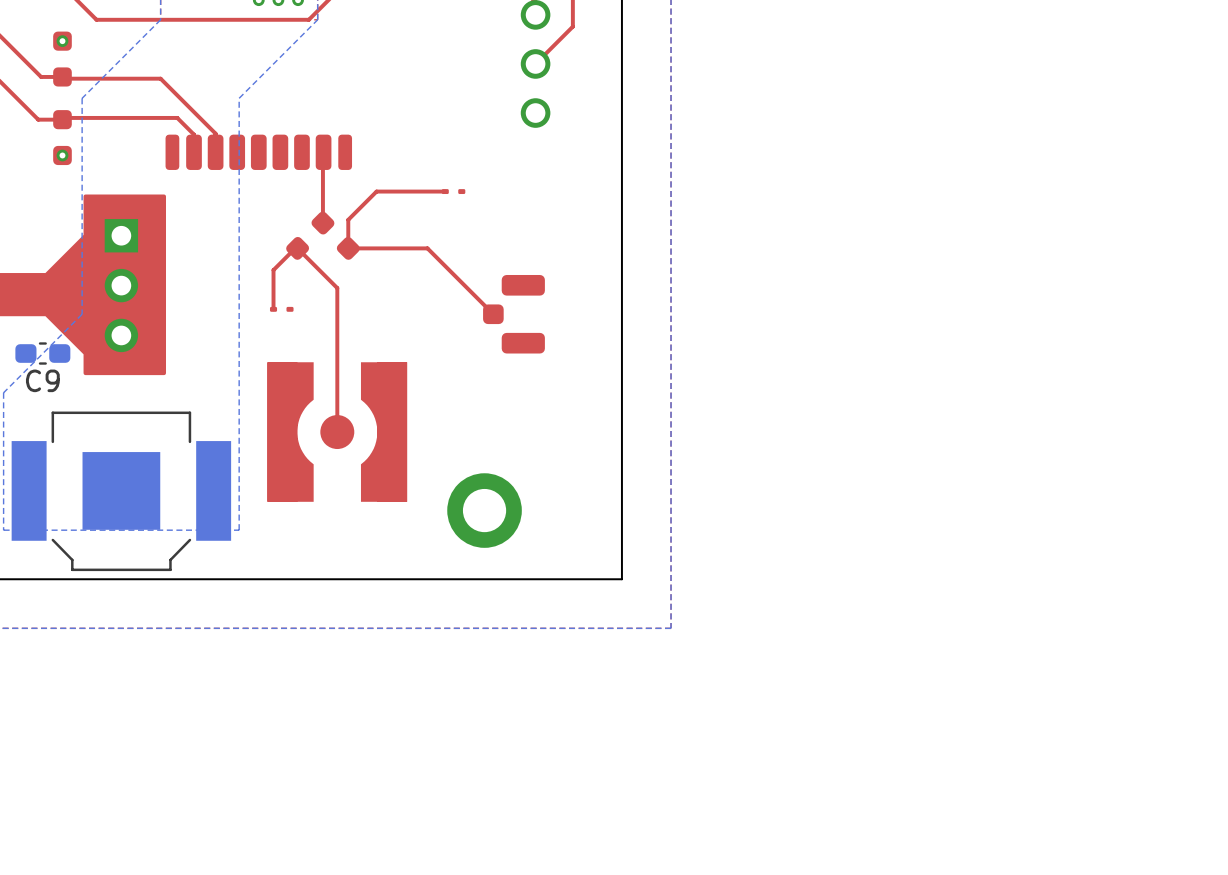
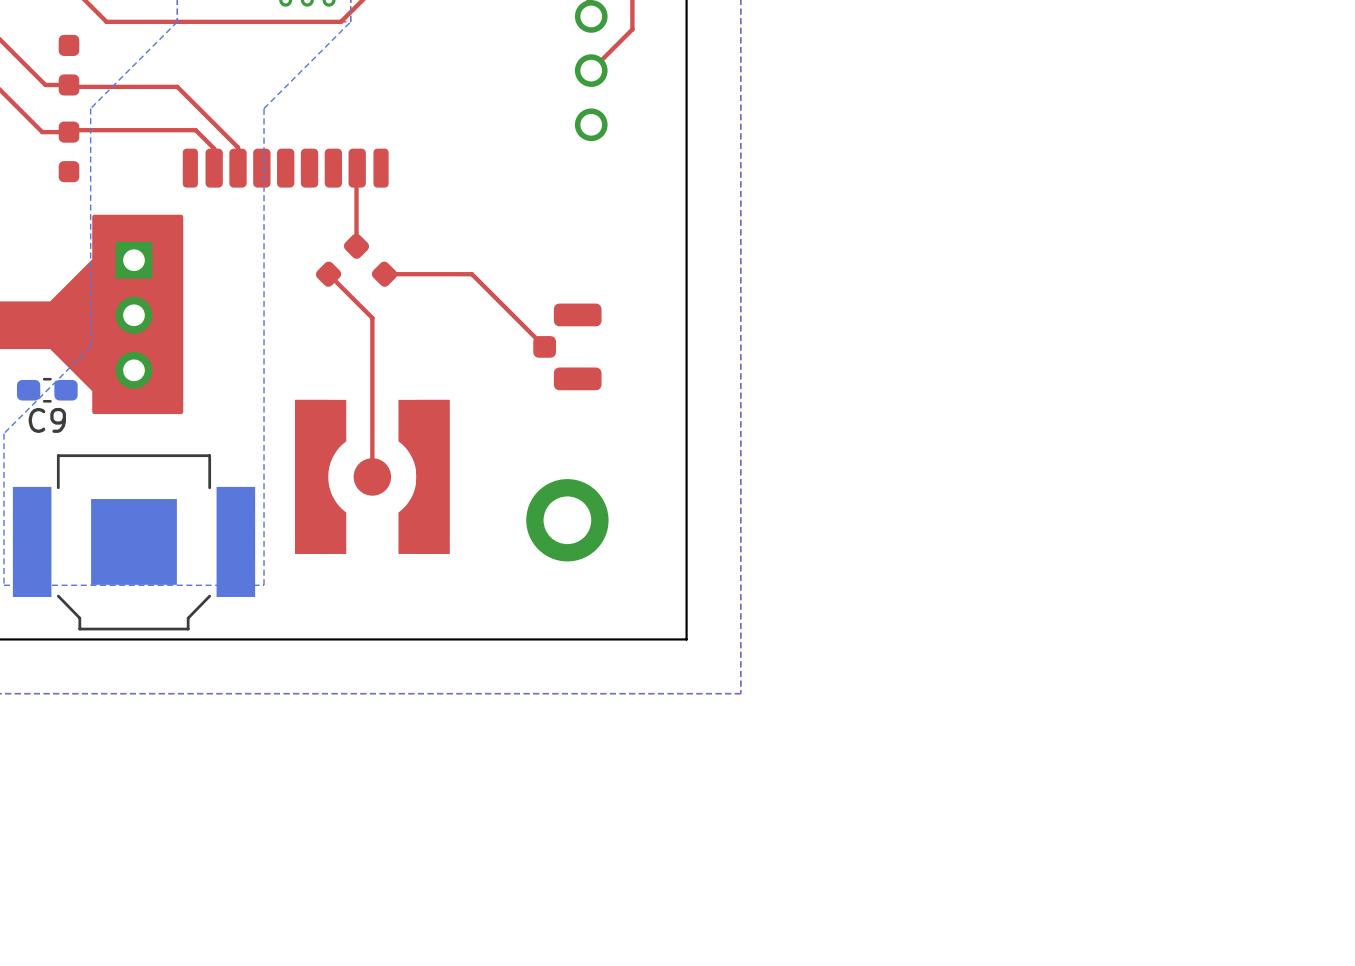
via: (62, 41) -> none
via: (62, 155) -> none
top track: (445, 191) (376, 191) (348, 219) (348, 248) -> none
part: (453, 191) -> none
top track: (297, 248) (295, 248) (273, 270) (273, 309) -> none
part: (281, 309) -> none
part position: (484, 510) -> (567, 520)

